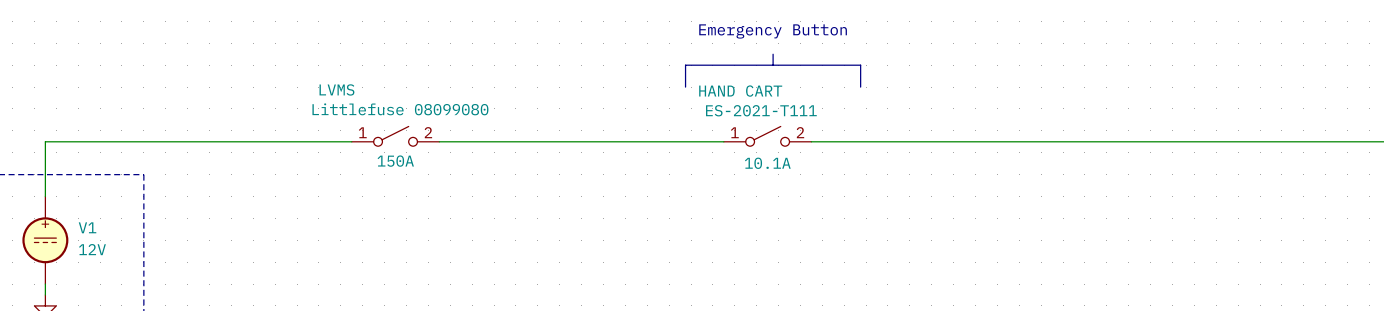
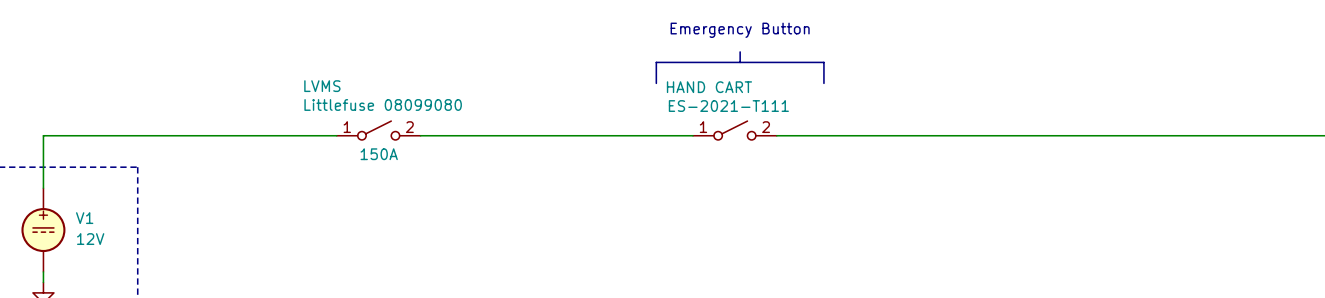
part text: 10.1A (767, 163) -> none

